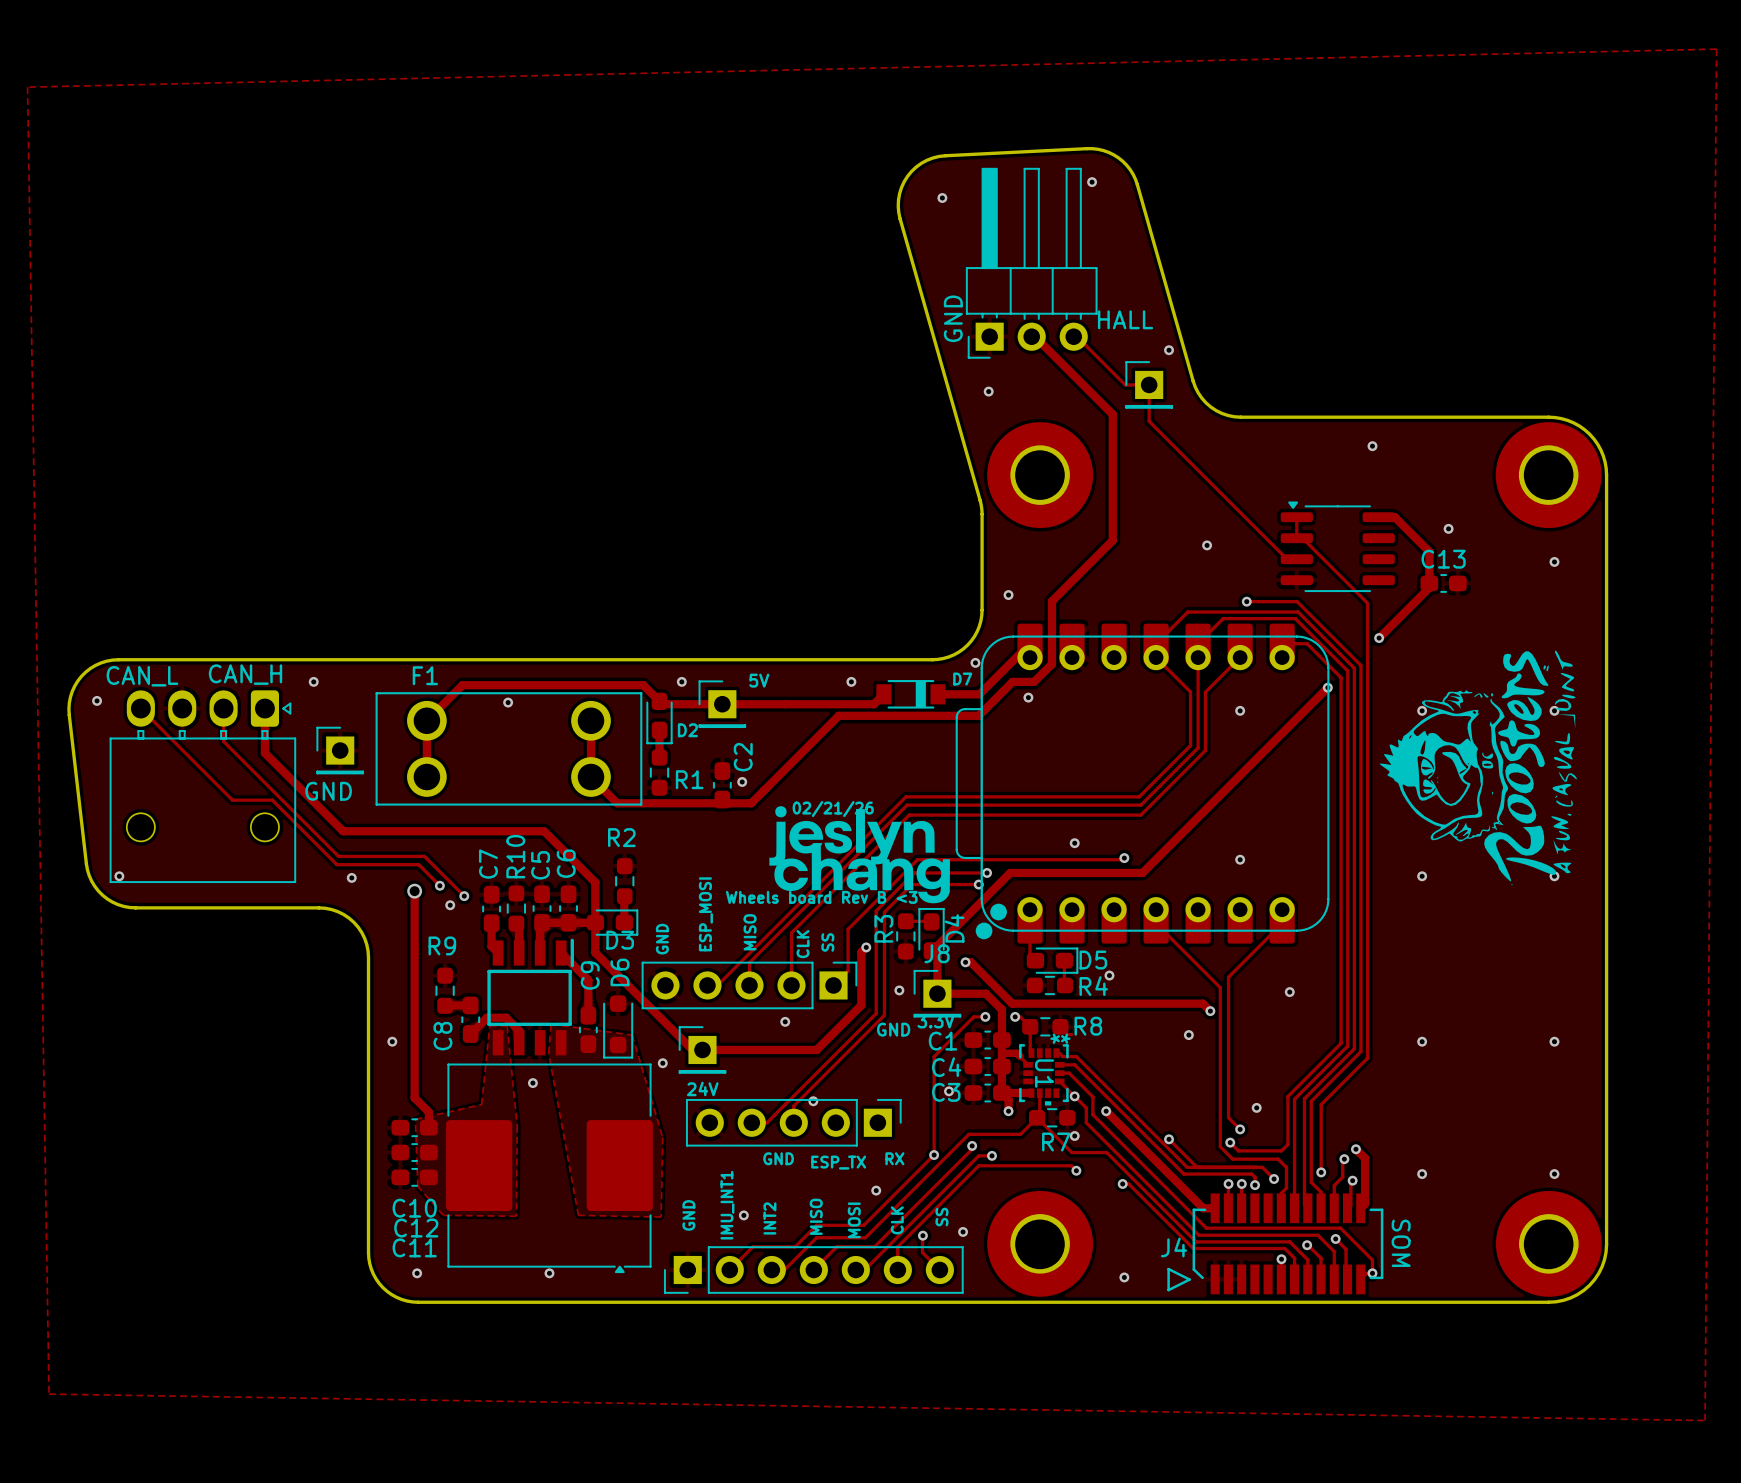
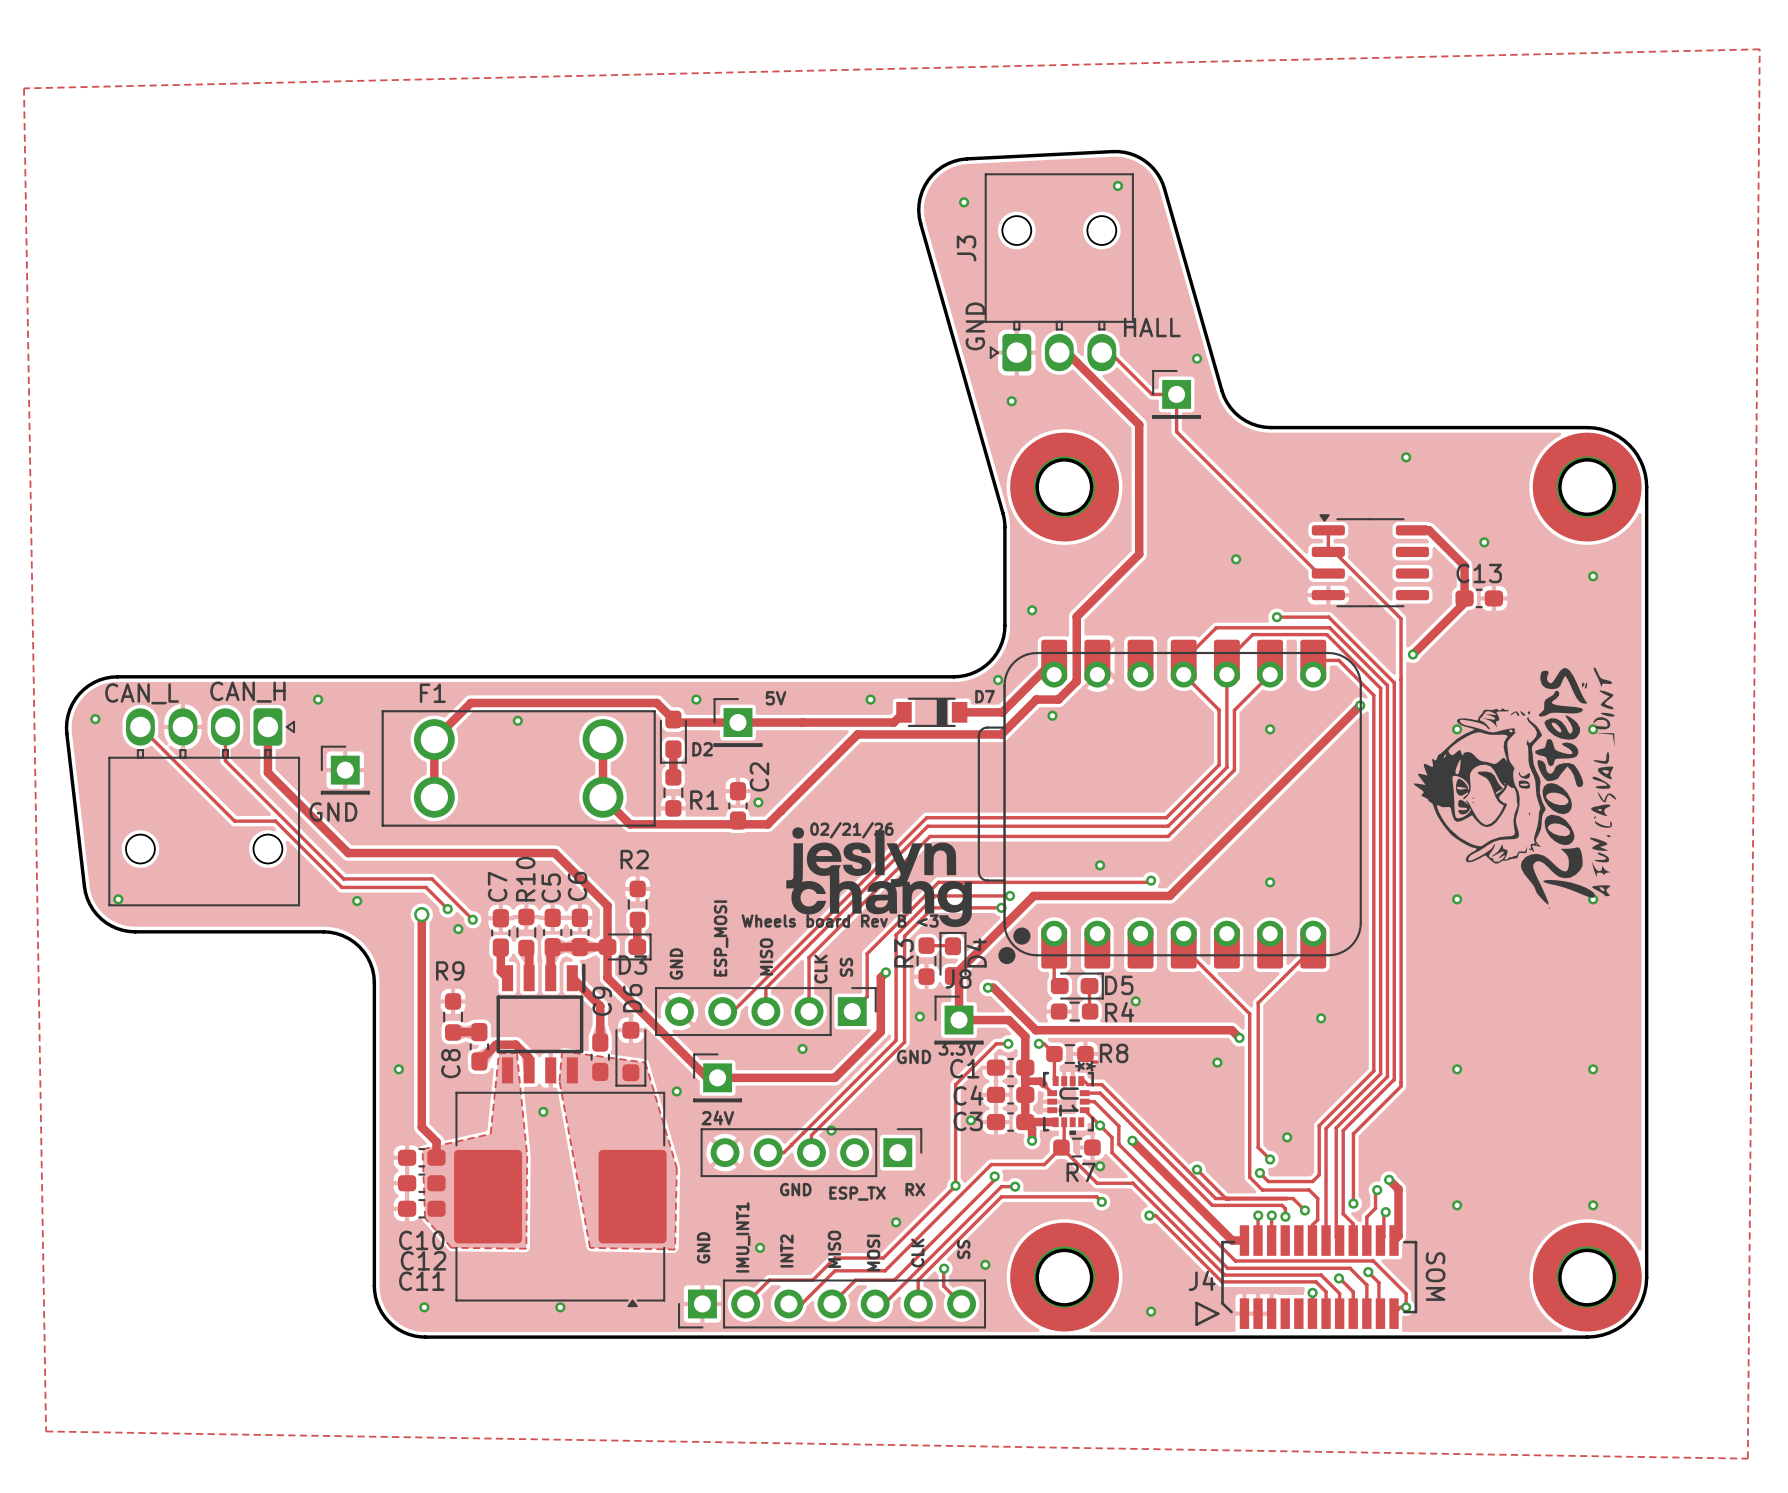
part: (1031, 263) -> none
J3: none -> (1059, 272)

